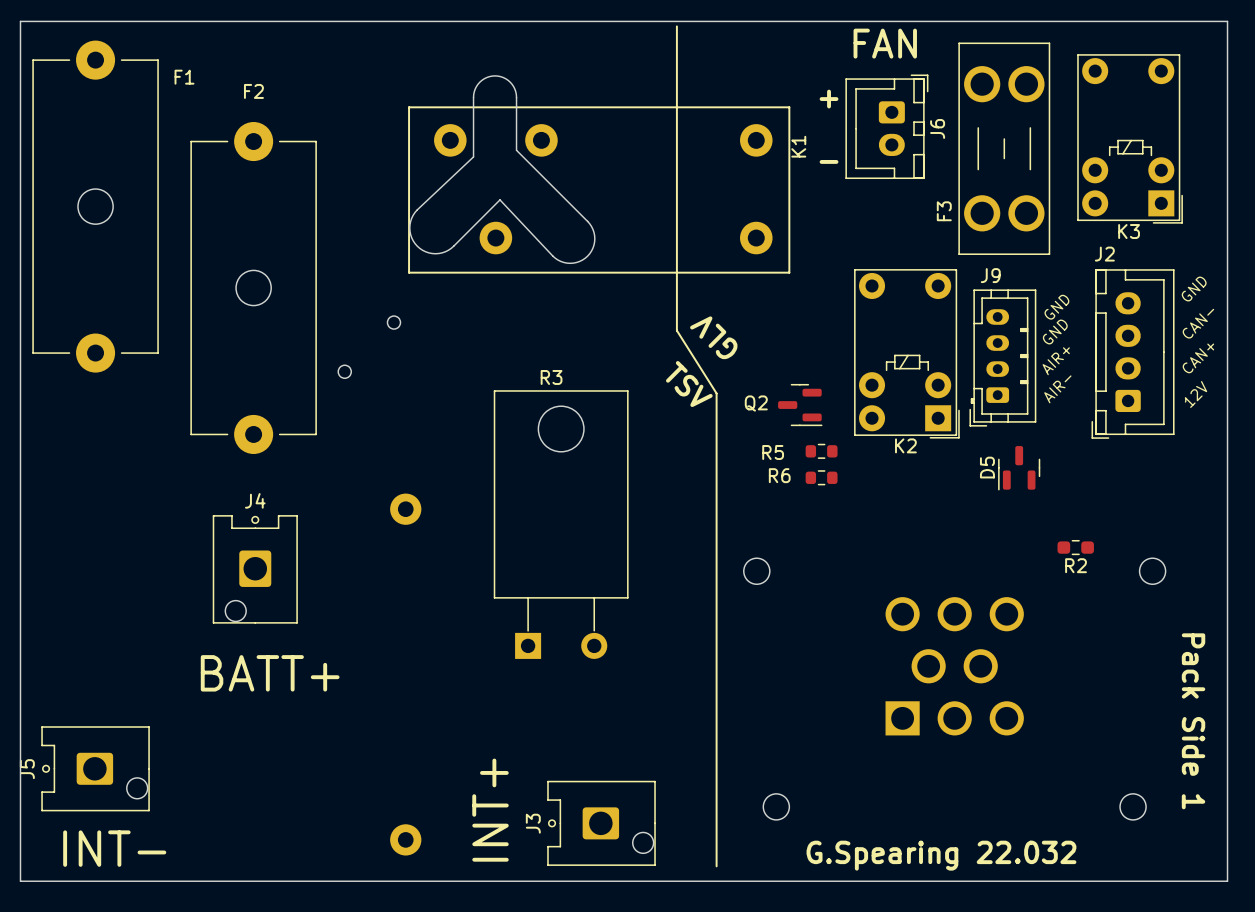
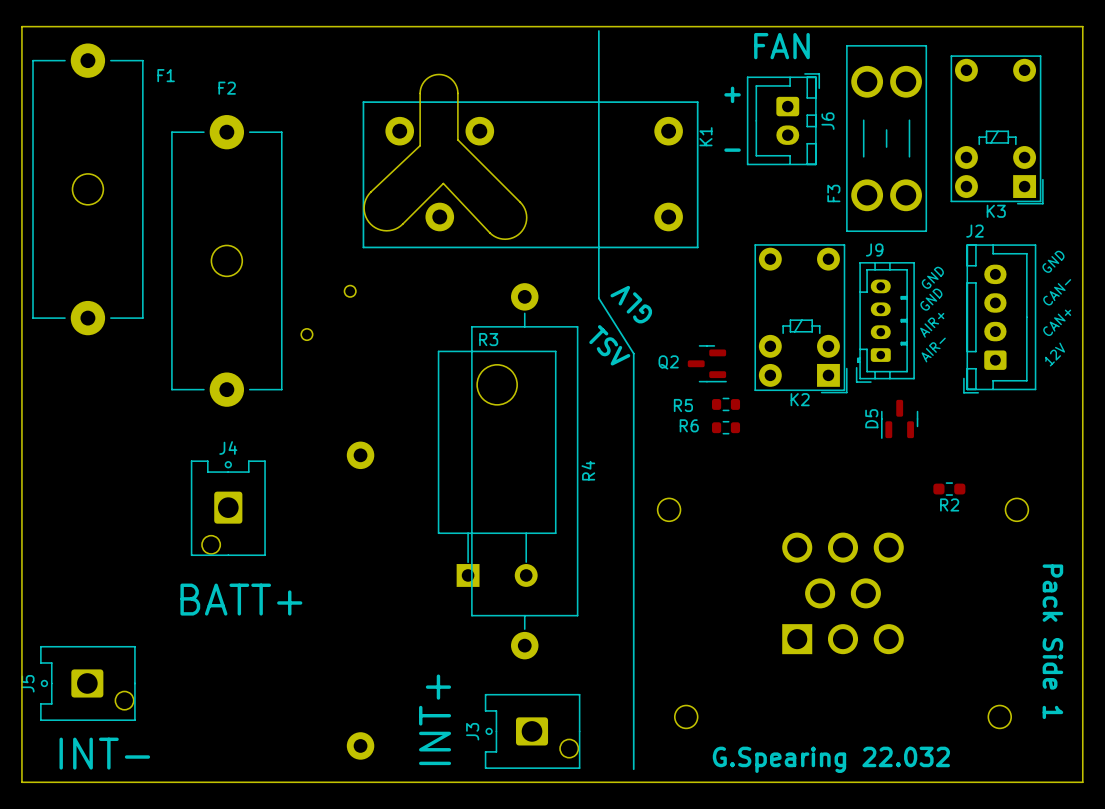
R4: none -> (524, 471)

